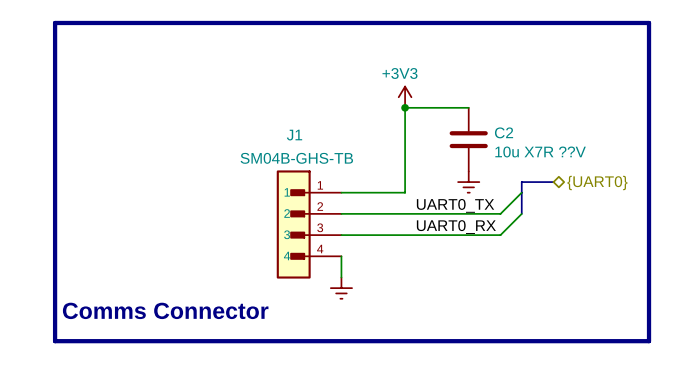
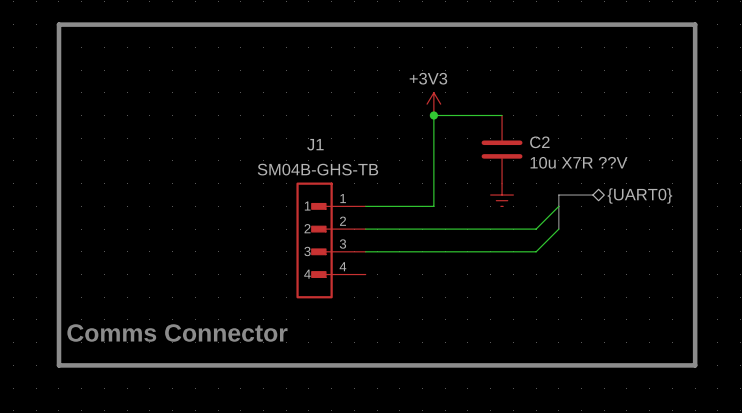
label: UART0_TX (455, 205) -> none
label: UART0_RX (456, 227) -> none
wire: (341, 256) (341, 277) -> none
power symbol: (341, 288) -> none

